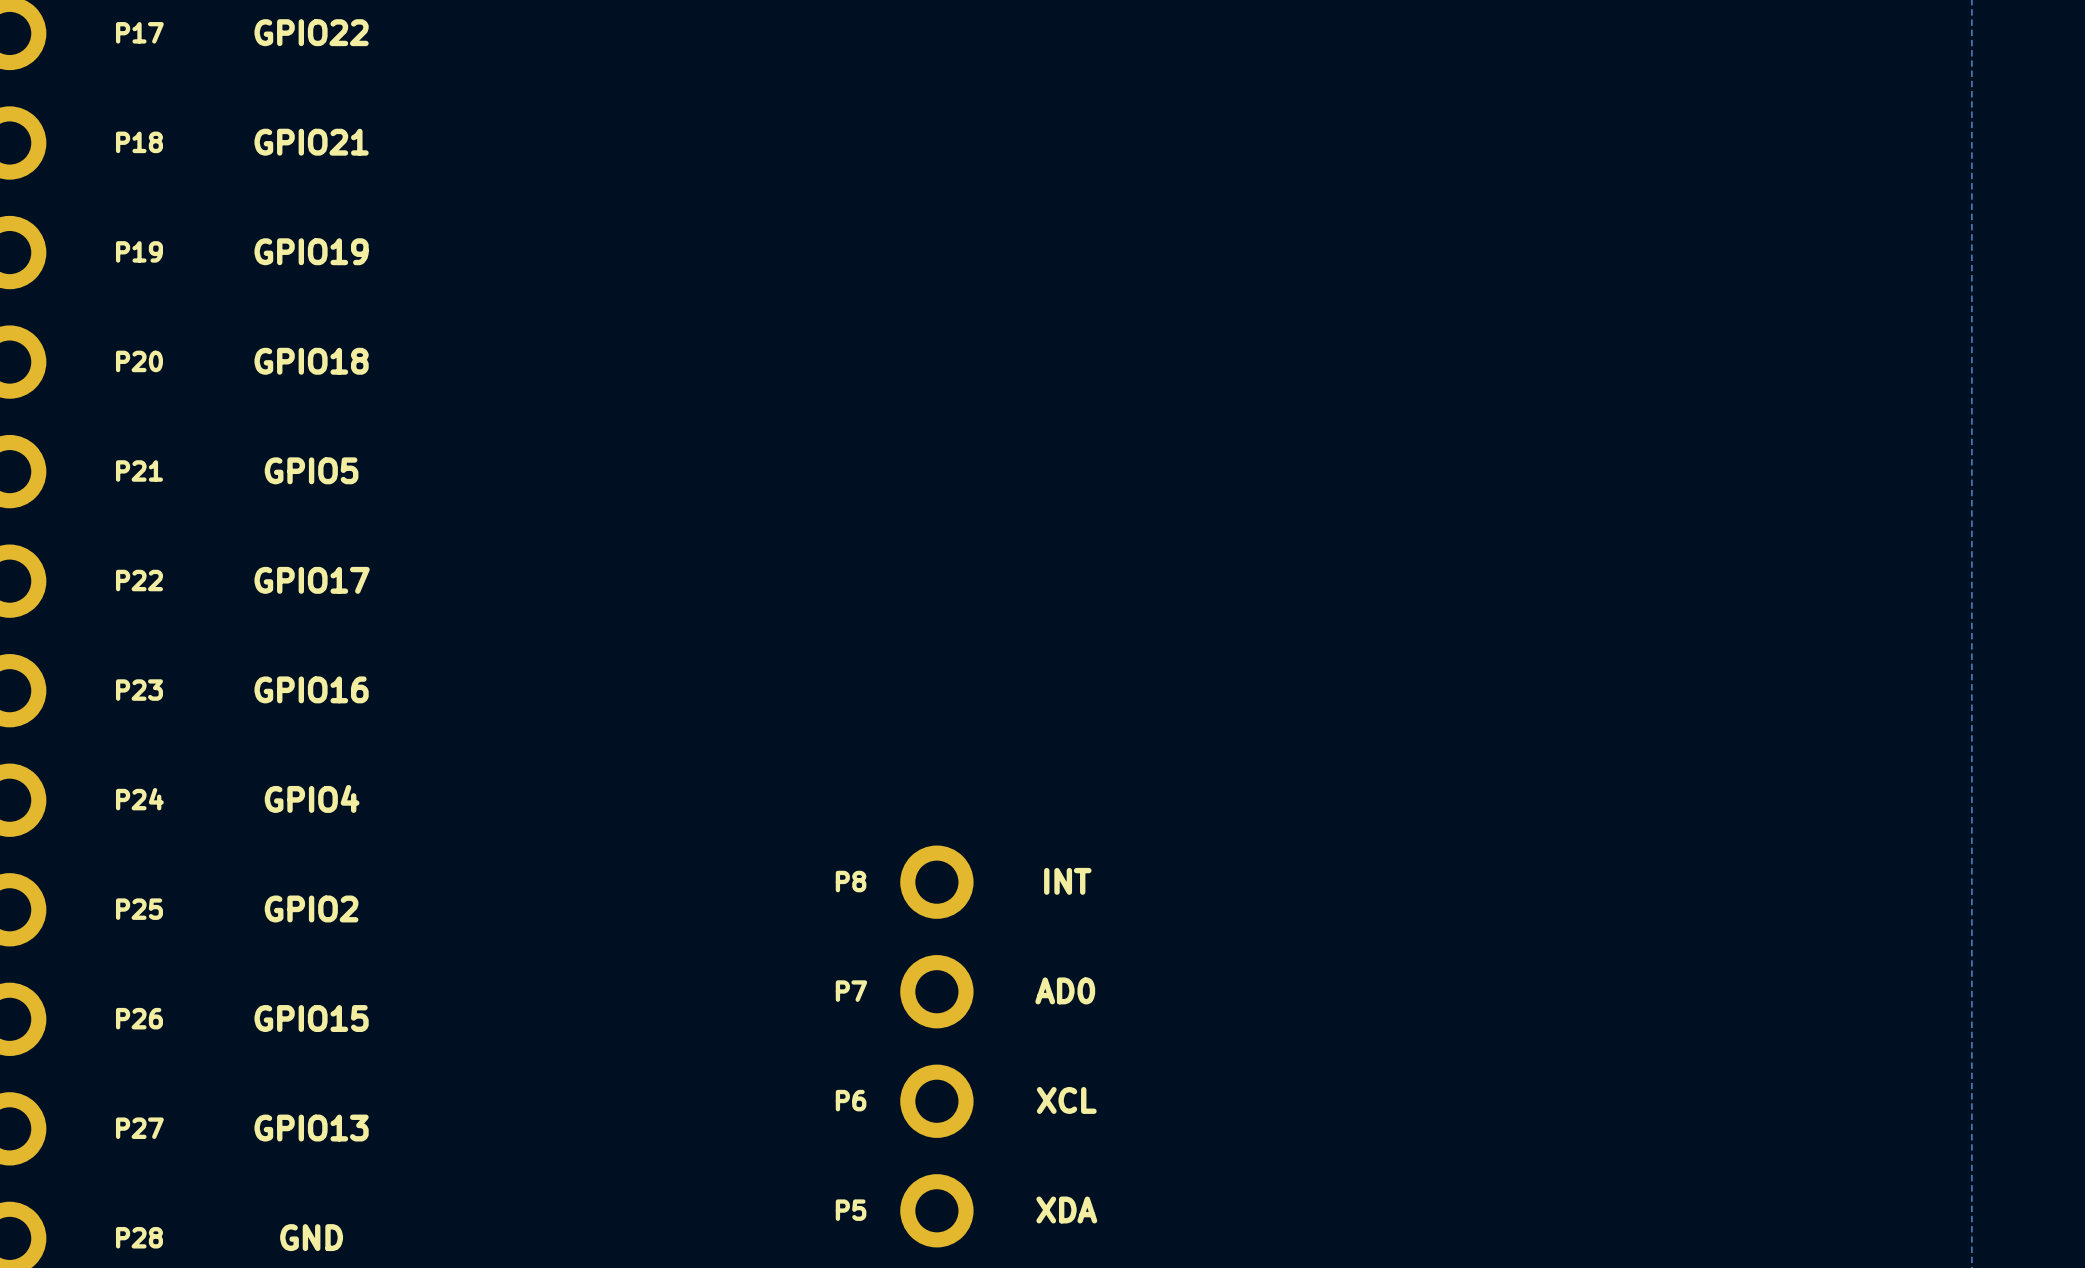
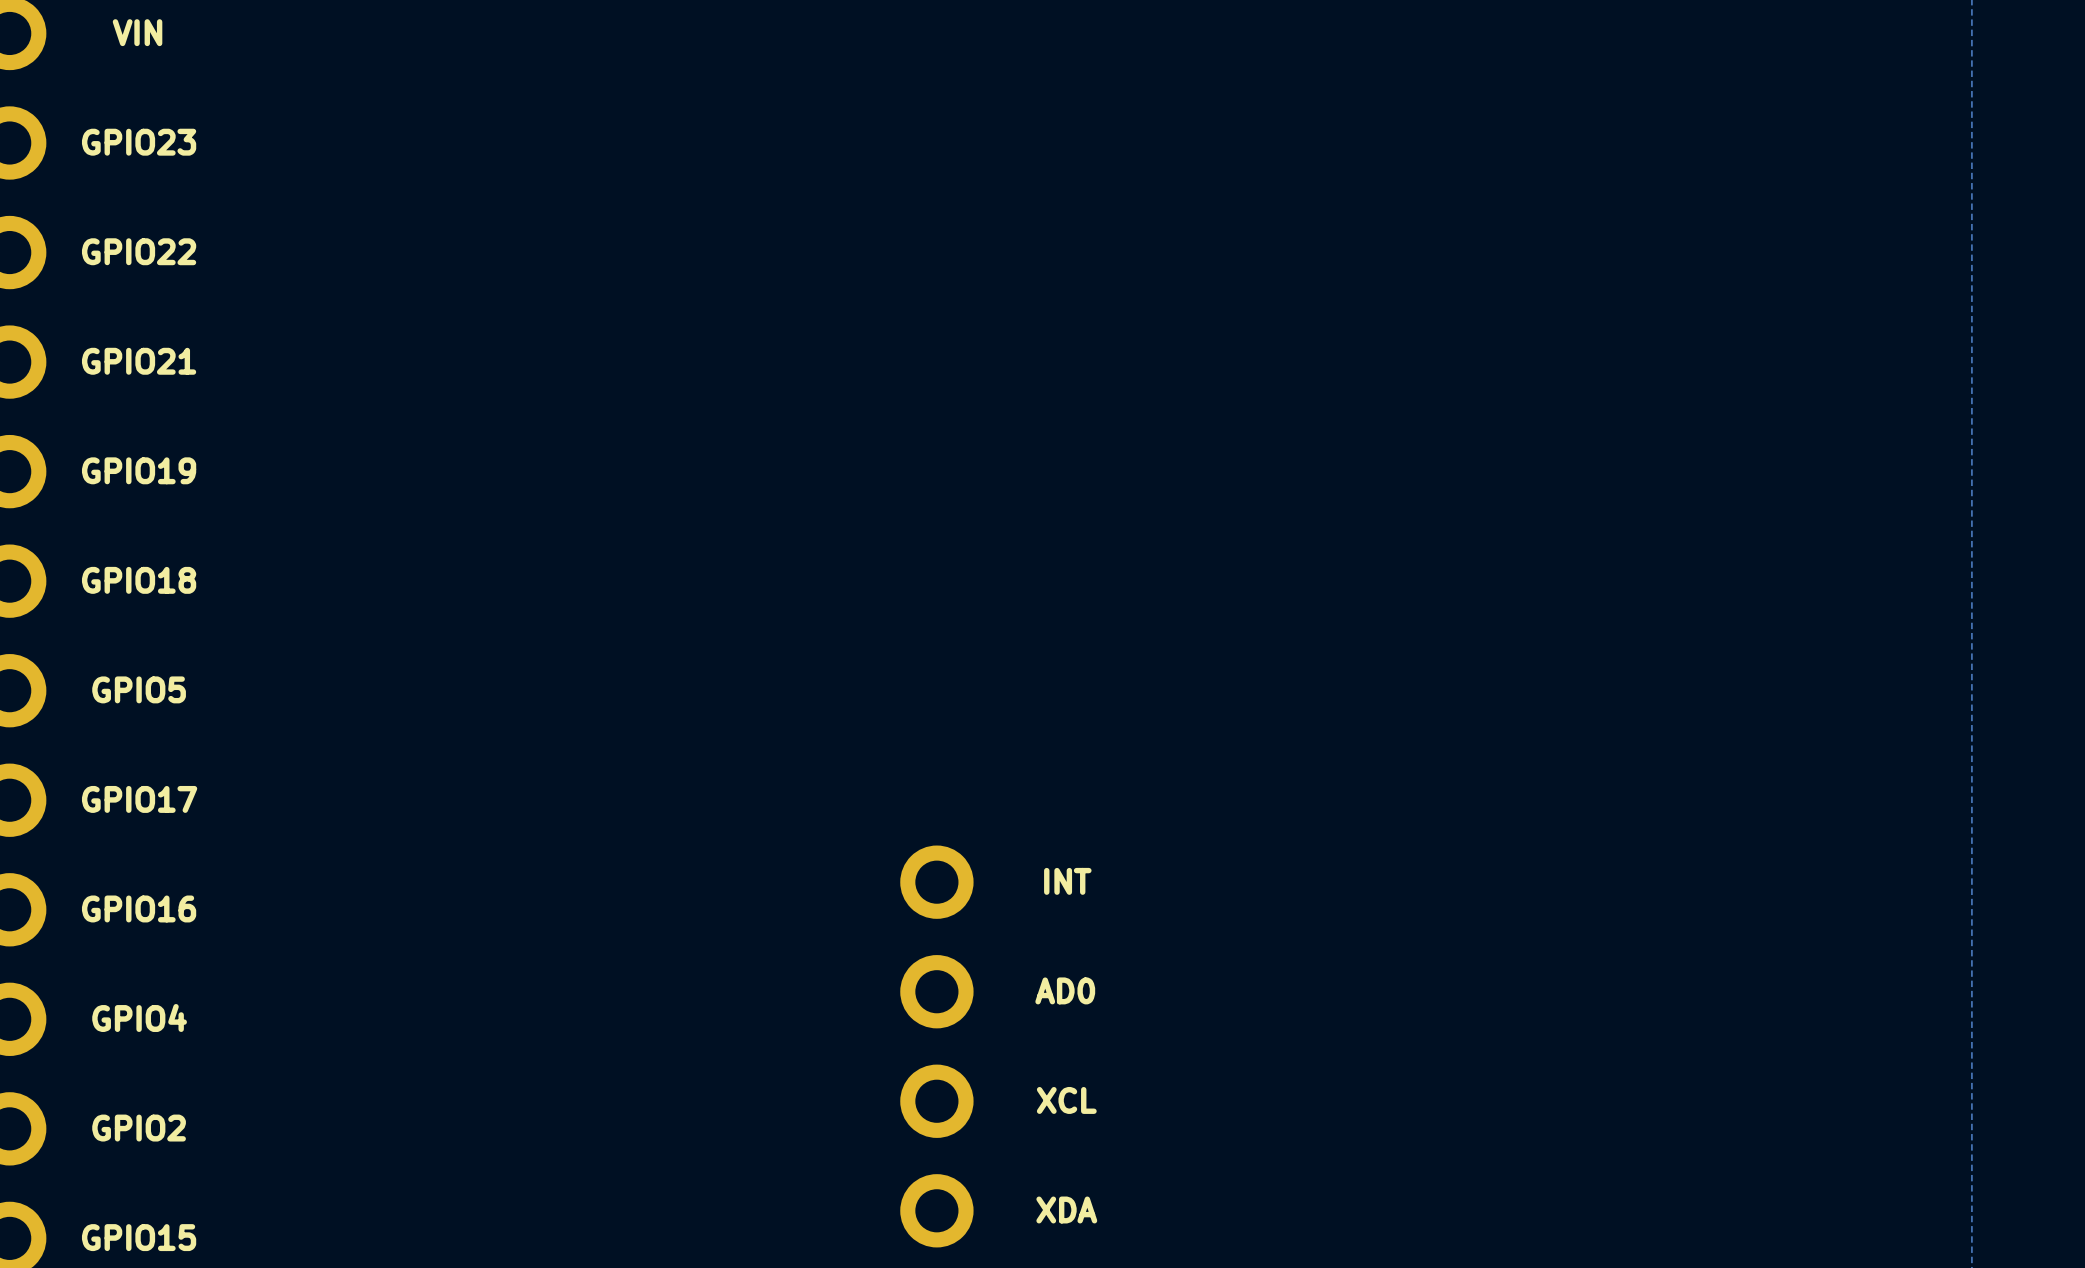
text: P17 (139, 32) -> VIN (137, 32)
text: GPIO22 (311, 32) -> none
text: P18 (139, 142) -> GPIO23 (139, 142)
text: GPIO21 (311, 142) -> none
text: P19 (139, 251) -> GPIO22 (139, 251)
text: GPIO19 (311, 251) -> none
text: P20 (139, 361) -> GPIO21 (139, 361)
text: GPIO18 (311, 361) -> none
text: P21 (139, 470) -> GPIO19 (139, 470)
text: GPIO5 (311, 470) -> none
text: P22 (139, 580) -> GPIO18 (139, 580)
text: GPIO17 (312, 580) -> none
text: GPIO16 (311, 689) -> none
text: P23 (139, 690) -> GPIO5 (139, 689)
text: GPIO4 (312, 798) -> none
text: P24 (139, 799) -> GPIO17 (139, 799)
text: P8 (851, 881) -> none
text: GPIO2 (311, 908) -> none
text: P25 (139, 909) -> GPIO16 (139, 908)
text: P7 (851, 991) -> none
text: P26 (139, 1018) -> GPIO4 (139, 1018)
text: GPIO15 (311, 1018) -> none
text: P6 (851, 1100) -> none
text: P27 (139, 1128) -> GPIO2 (139, 1128)
text: GPIO13 (311, 1128) -> none
text: P5 (851, 1210) -> none
text: P28 (139, 1237) -> GPIO15 (139, 1237)
text: GND (311, 1237) -> none

